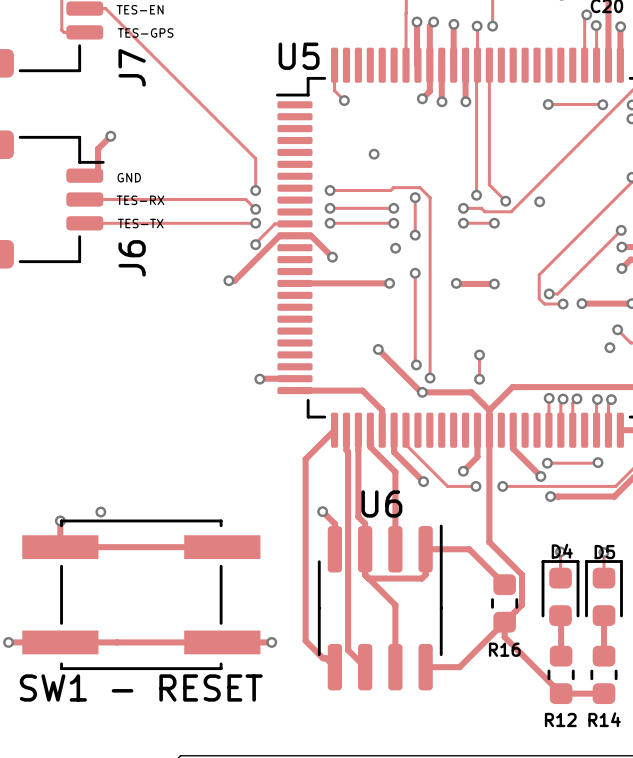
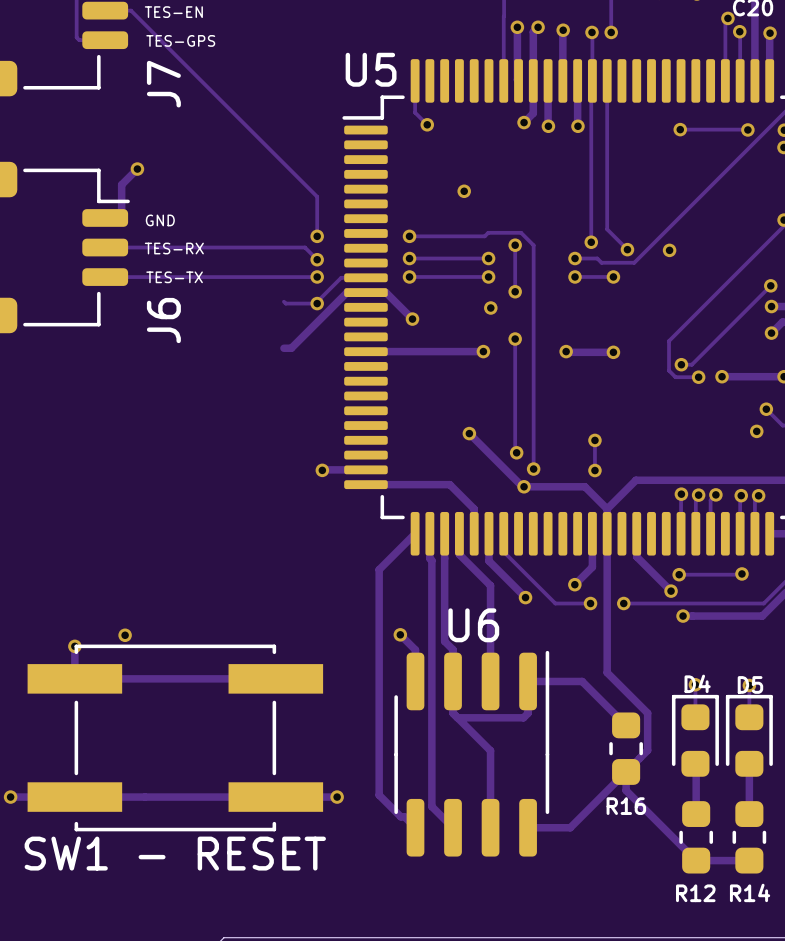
track: none -> (283, 301) (285, 303) (317, 303)
via: (228, 280) -> none

